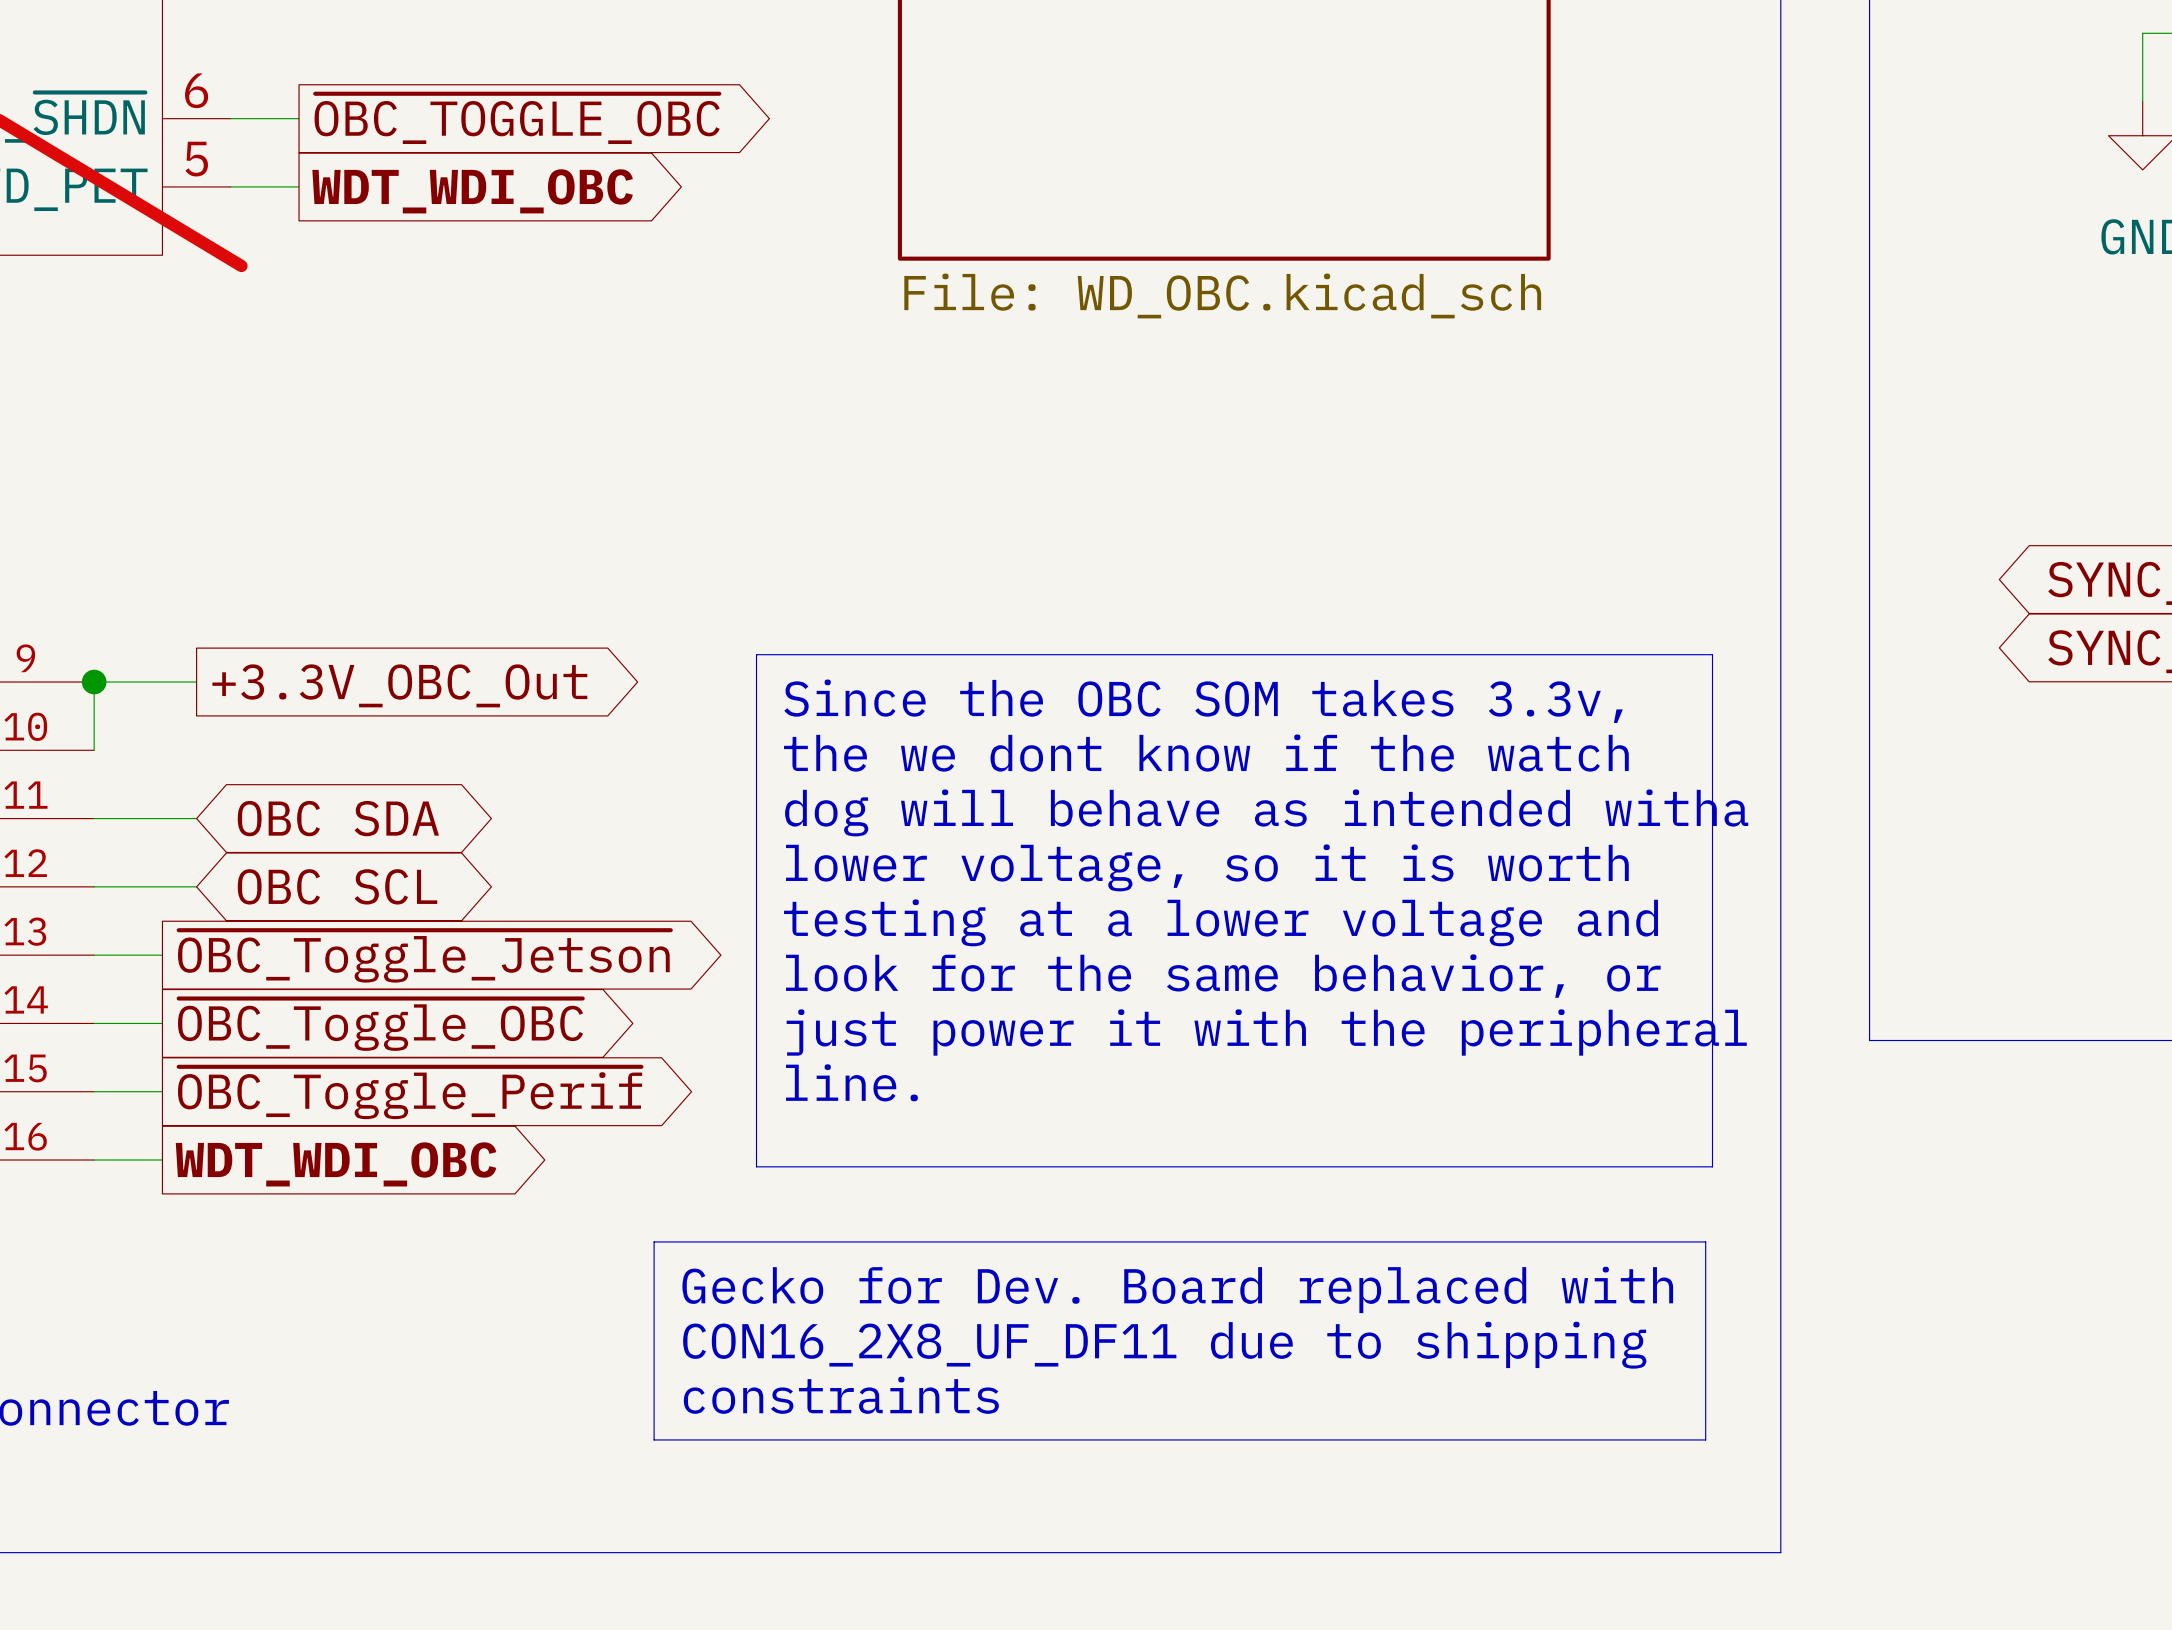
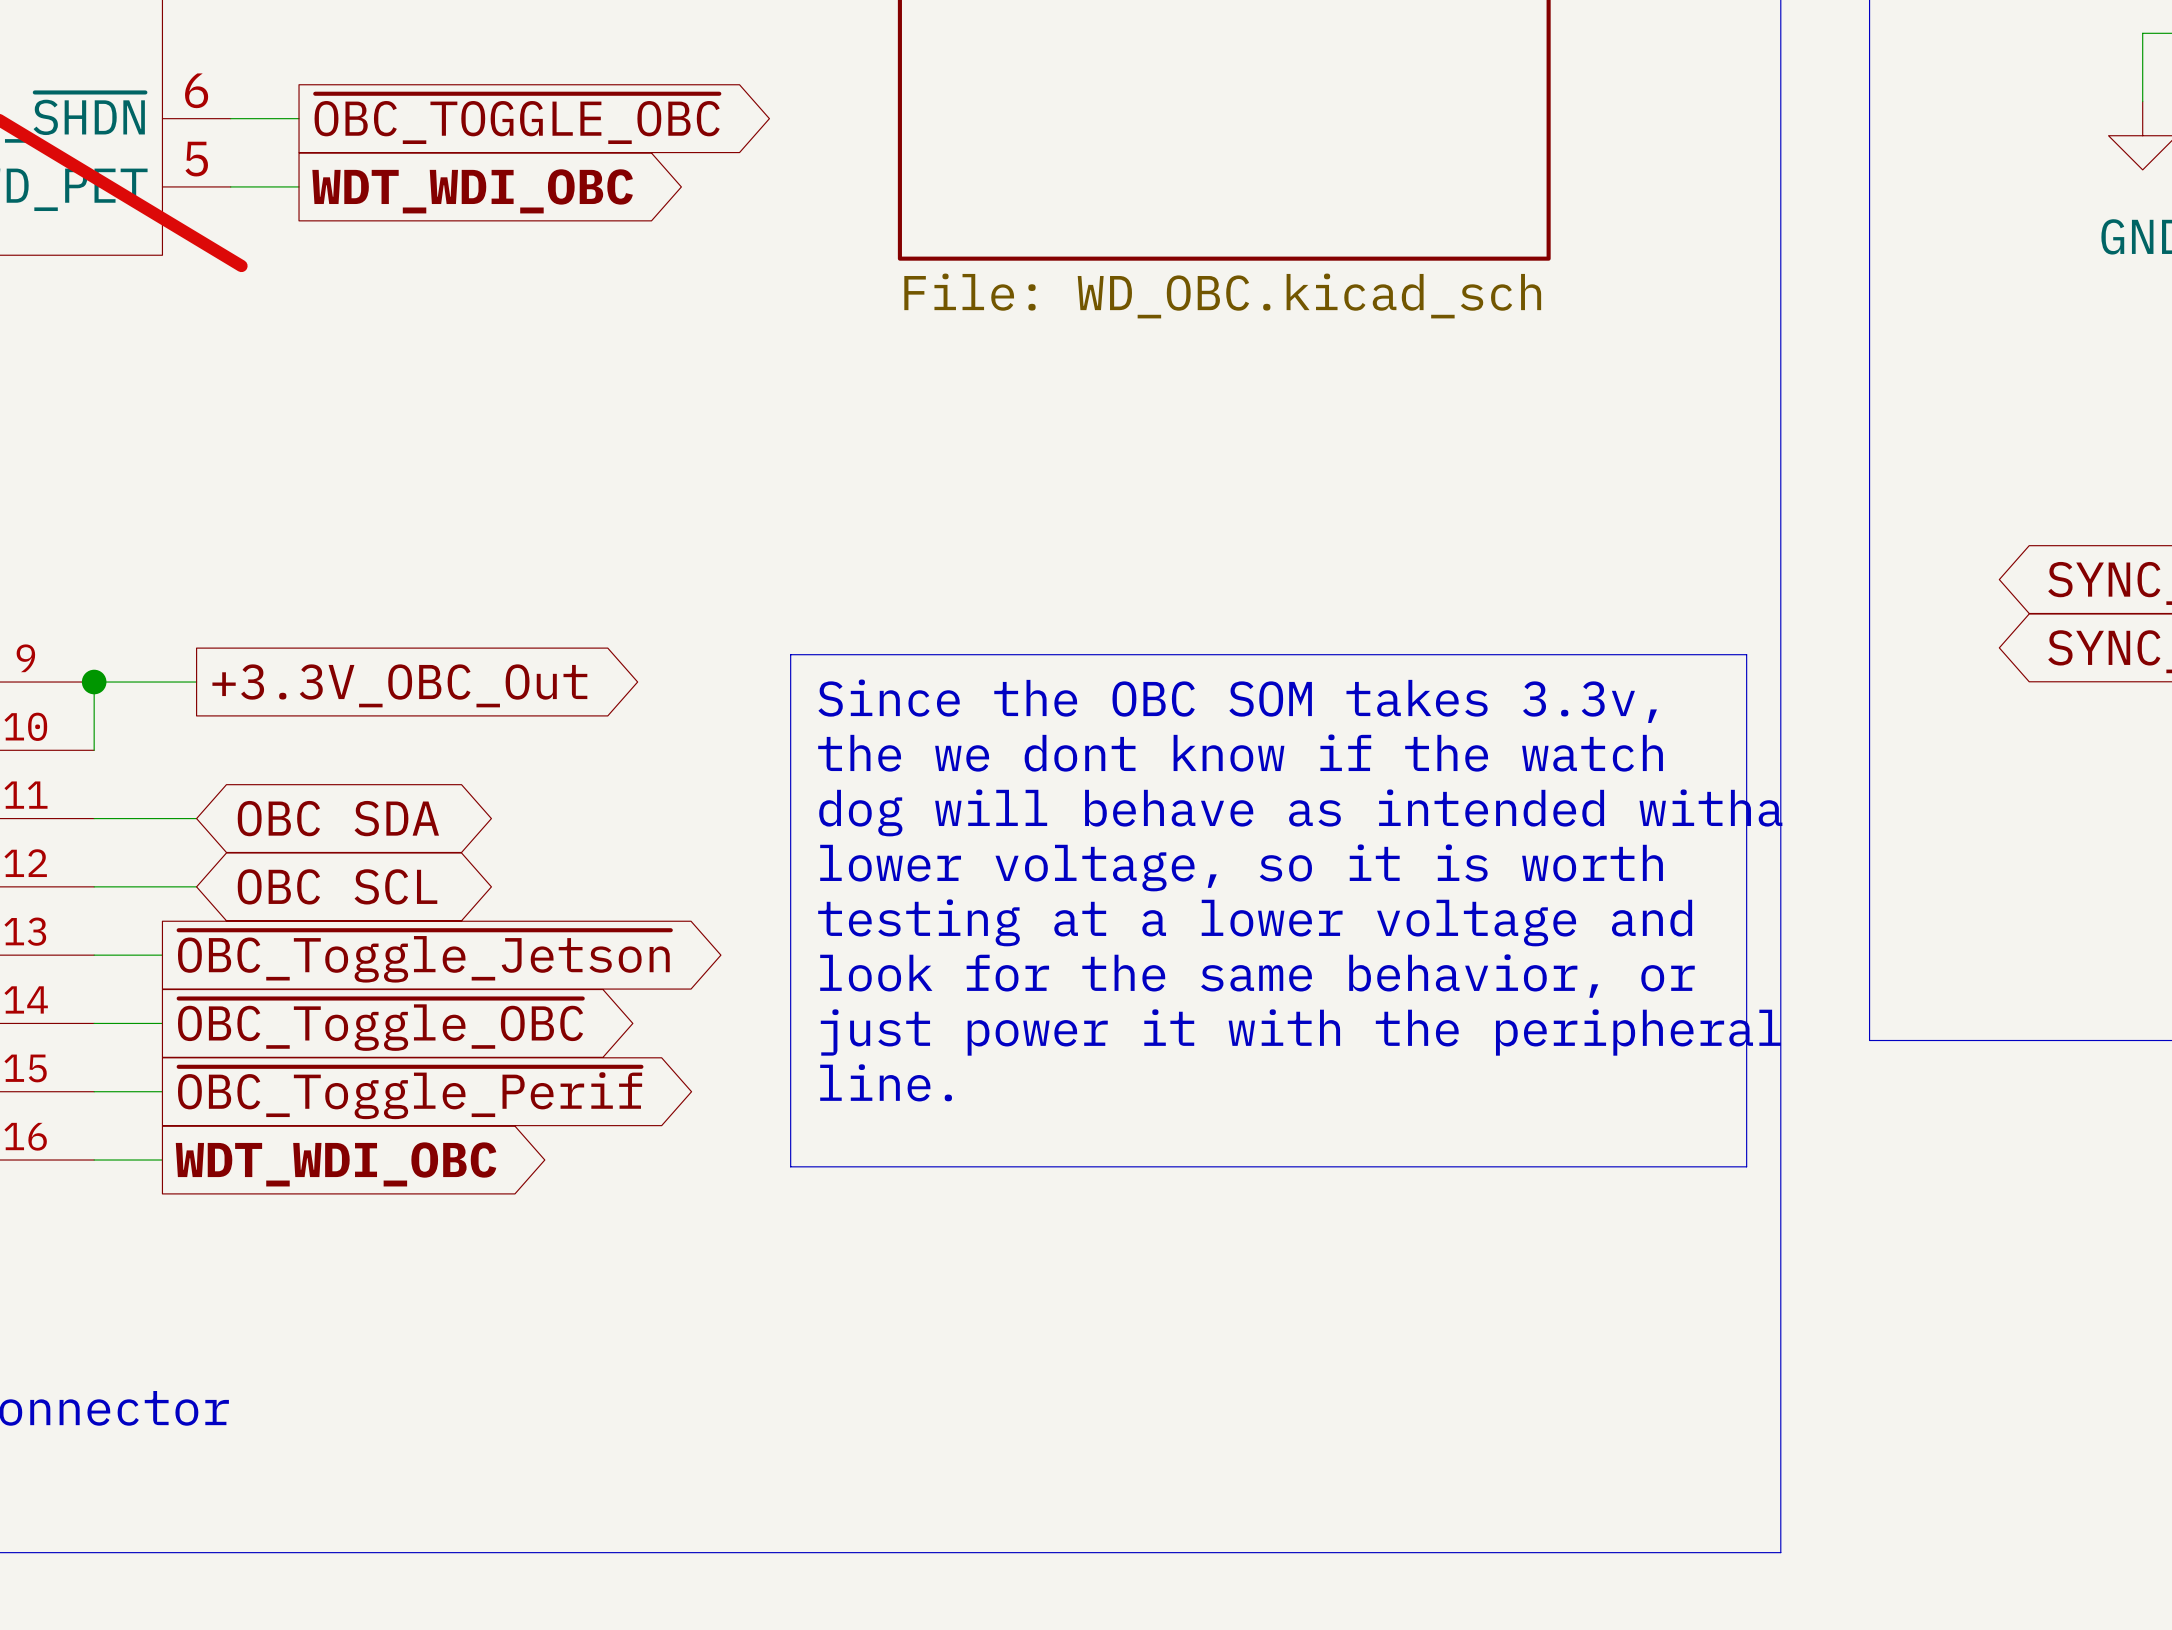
line: (790, 654) (756, 654) (756, 1166) (790, 1166) -> (790, 654) (790, 1166)
line: (1712, 654) (1712, 1166) -> (1712, 654) (1746, 654) (1746, 1166) (1712, 1166)
text position: Since the OBC SOM takes 3.3v, (1203, 701) -> Since the OBC SOM takes 3.3v, (1237, 701)
text position: the we dont know if the watch (1206, 753) -> the we dont know if the watch (1240, 753)
text position: dog will behave as intended witha (1266, 812) -> dog will behave as intended witha (1300, 812)
text position: lower voltage, so it is worth (1207, 867) -> lower voltage, so it is worth (1241, 867)
text position: testing at a lower voltage and (1221, 922) -> testing at a lower voltage and (1255, 922)
text position: look for the same behavior, or (1223, 976) -> look for the same behavior, or (1257, 976)
text position: just power it with the peripheral (1266, 1032) -> just power it with the peripheral (1300, 1032)
text position: line. (851, 1082) -> line. (886, 1082)
line: (654, 1241) (1705, 1241) (1705, 1439) (654, 1439) (654, 1241) -> none
text: Gecko for Dev. Board replaced with (1177, 1289) -> none
text: CON16_2X8_UF_DF11 due to shipping (1164, 1345) -> none
text: constraints (841, 1395) -> none

